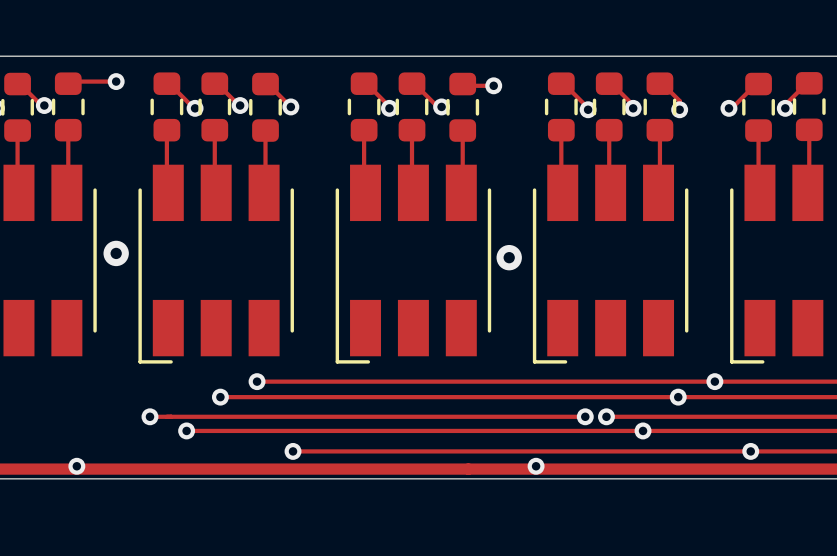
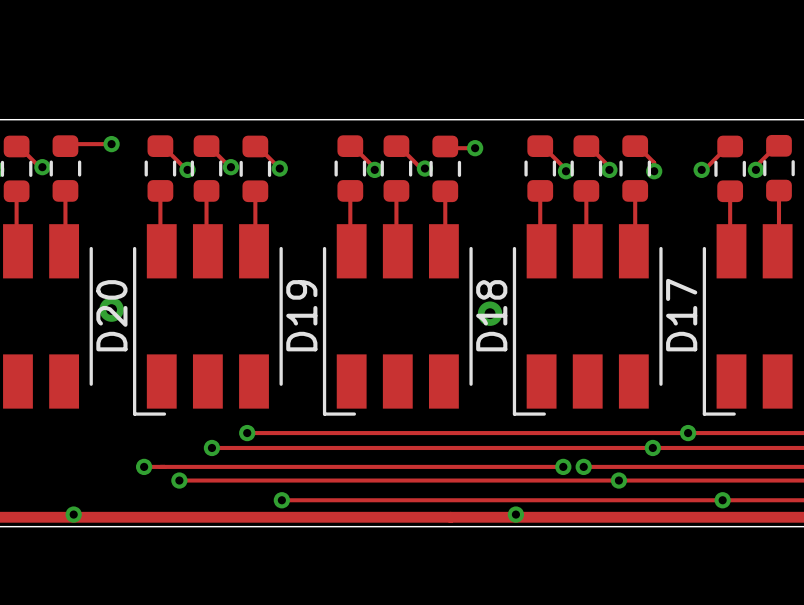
D20 name: none -> D20 (111, 315)
D19 name: none -> D19 (301, 315)
D18 name: none -> D18 (491, 315)
D17 name: none -> D17 (681, 315)

